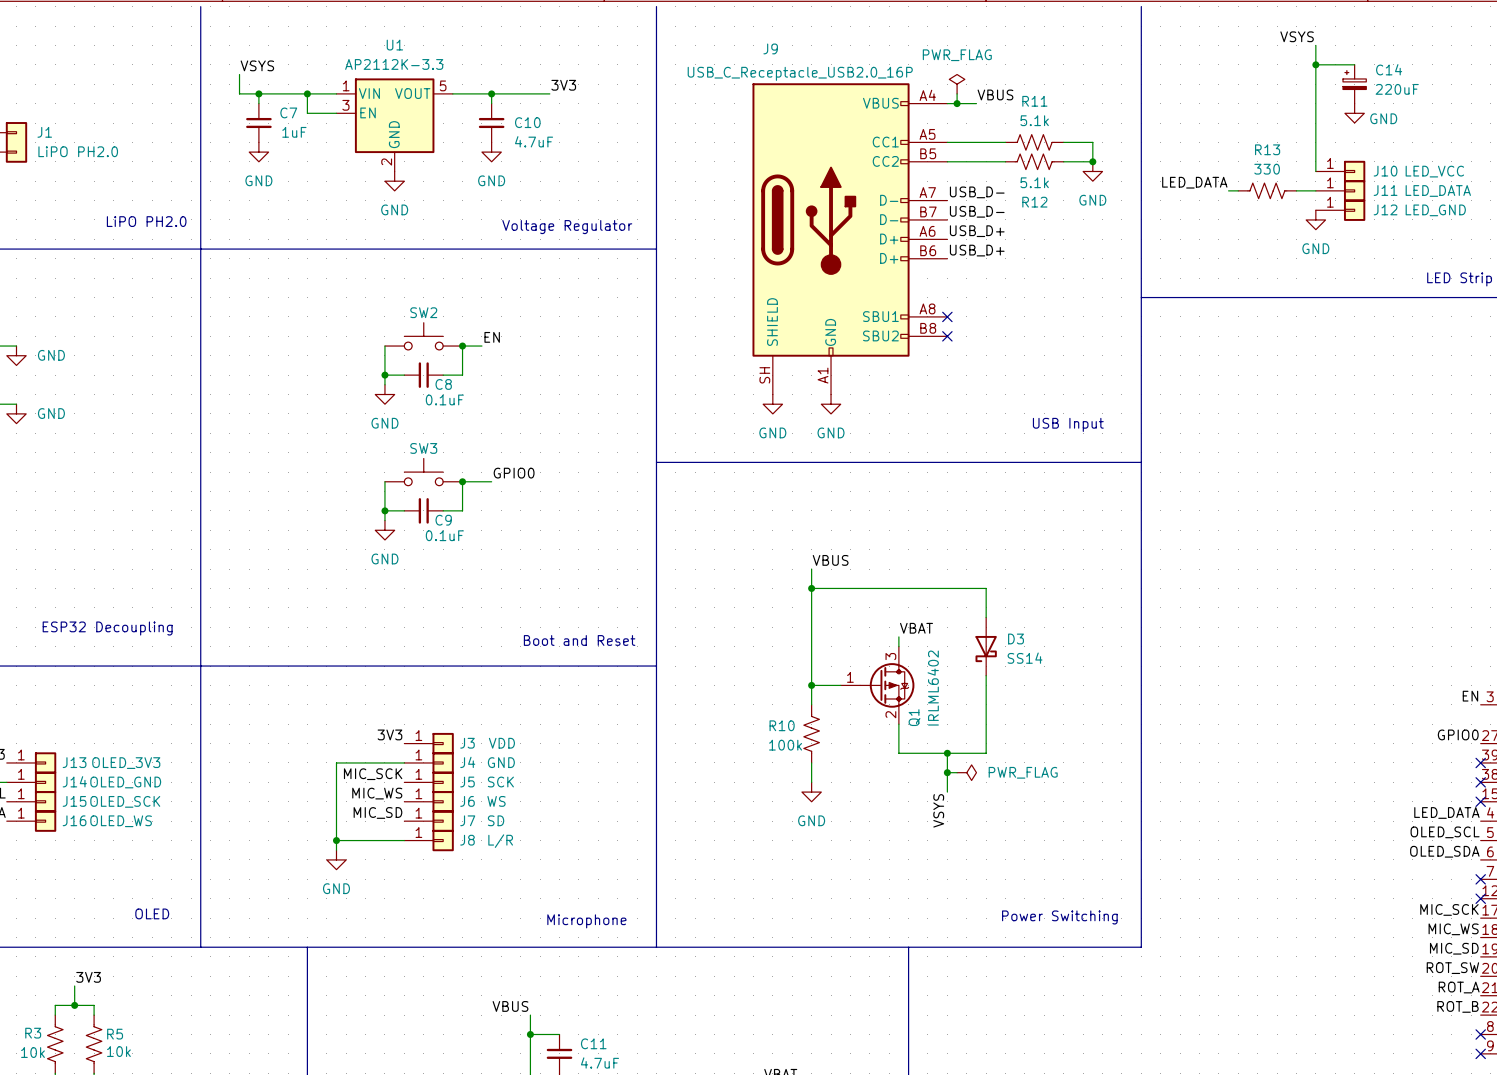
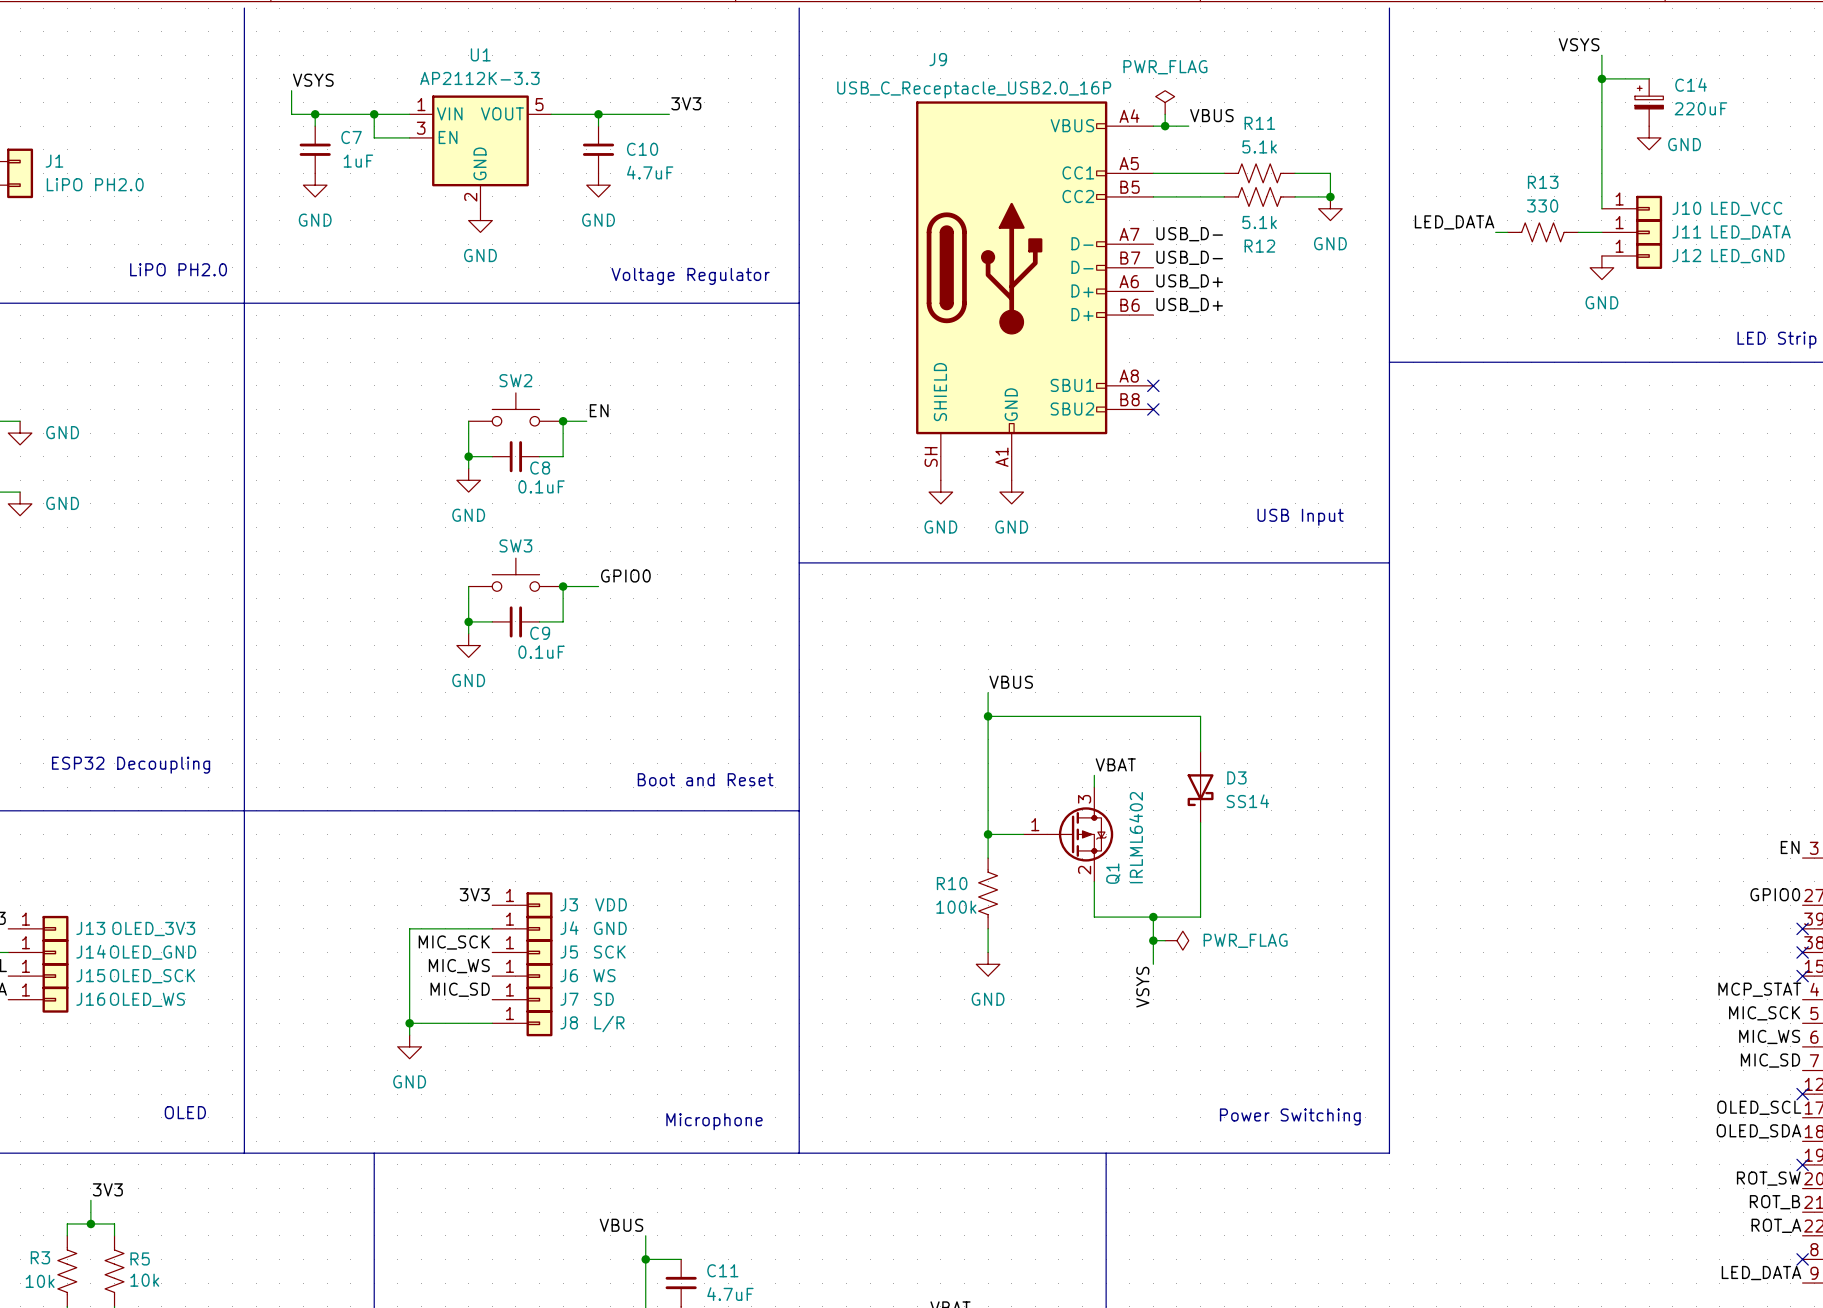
label: LED_DATA (1446, 812) -> MCP_STAT (1759, 989)
label: OLED_SCL (1445, 832) -> MIC_SCK (1764, 1013)
label: OLED_SDA (1444, 851) -> MIC_WS (1769, 1036)
no-connect mark: (1480, 879) -> none
label: MIC_SCK (1449, 909) -> OLED_SCL (1759, 1107)
label: MIC_WS (1453, 929) -> OLED_SDA (1758, 1131)
label position: MIC_SD (1454, 948) -> MIC_SD (1770, 1060)
no-connect mark: none -> (1802, 1164)
label: ROT_A (1459, 987) -> ROT_B (1774, 1202)
label: ROT_B (1457, 1006) -> ROT_A (1776, 1225)
label: none -> LED_DATA (1761, 1273)
no-connect mark: (1480, 1053) -> none

